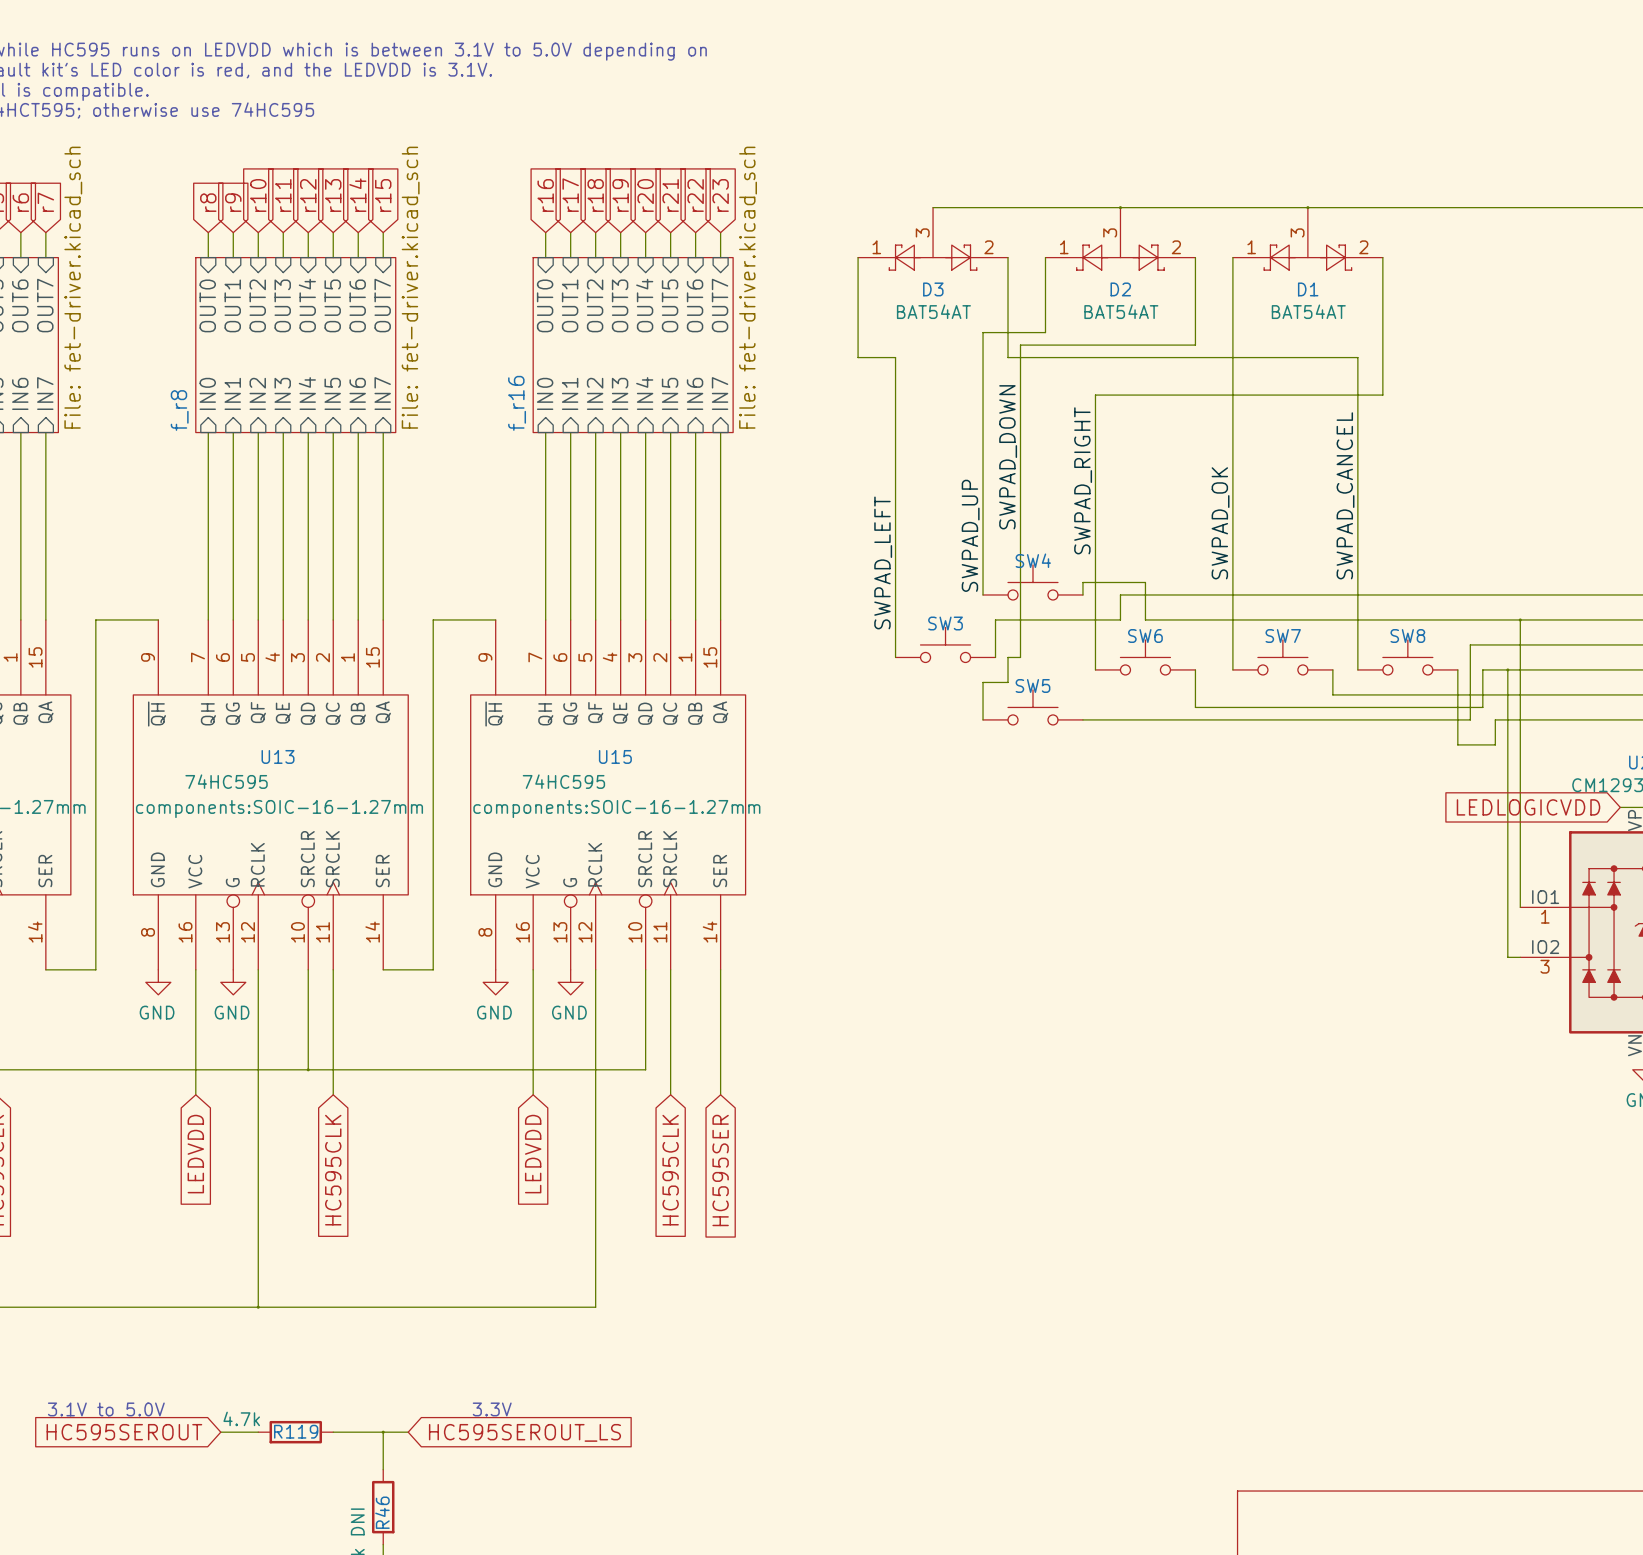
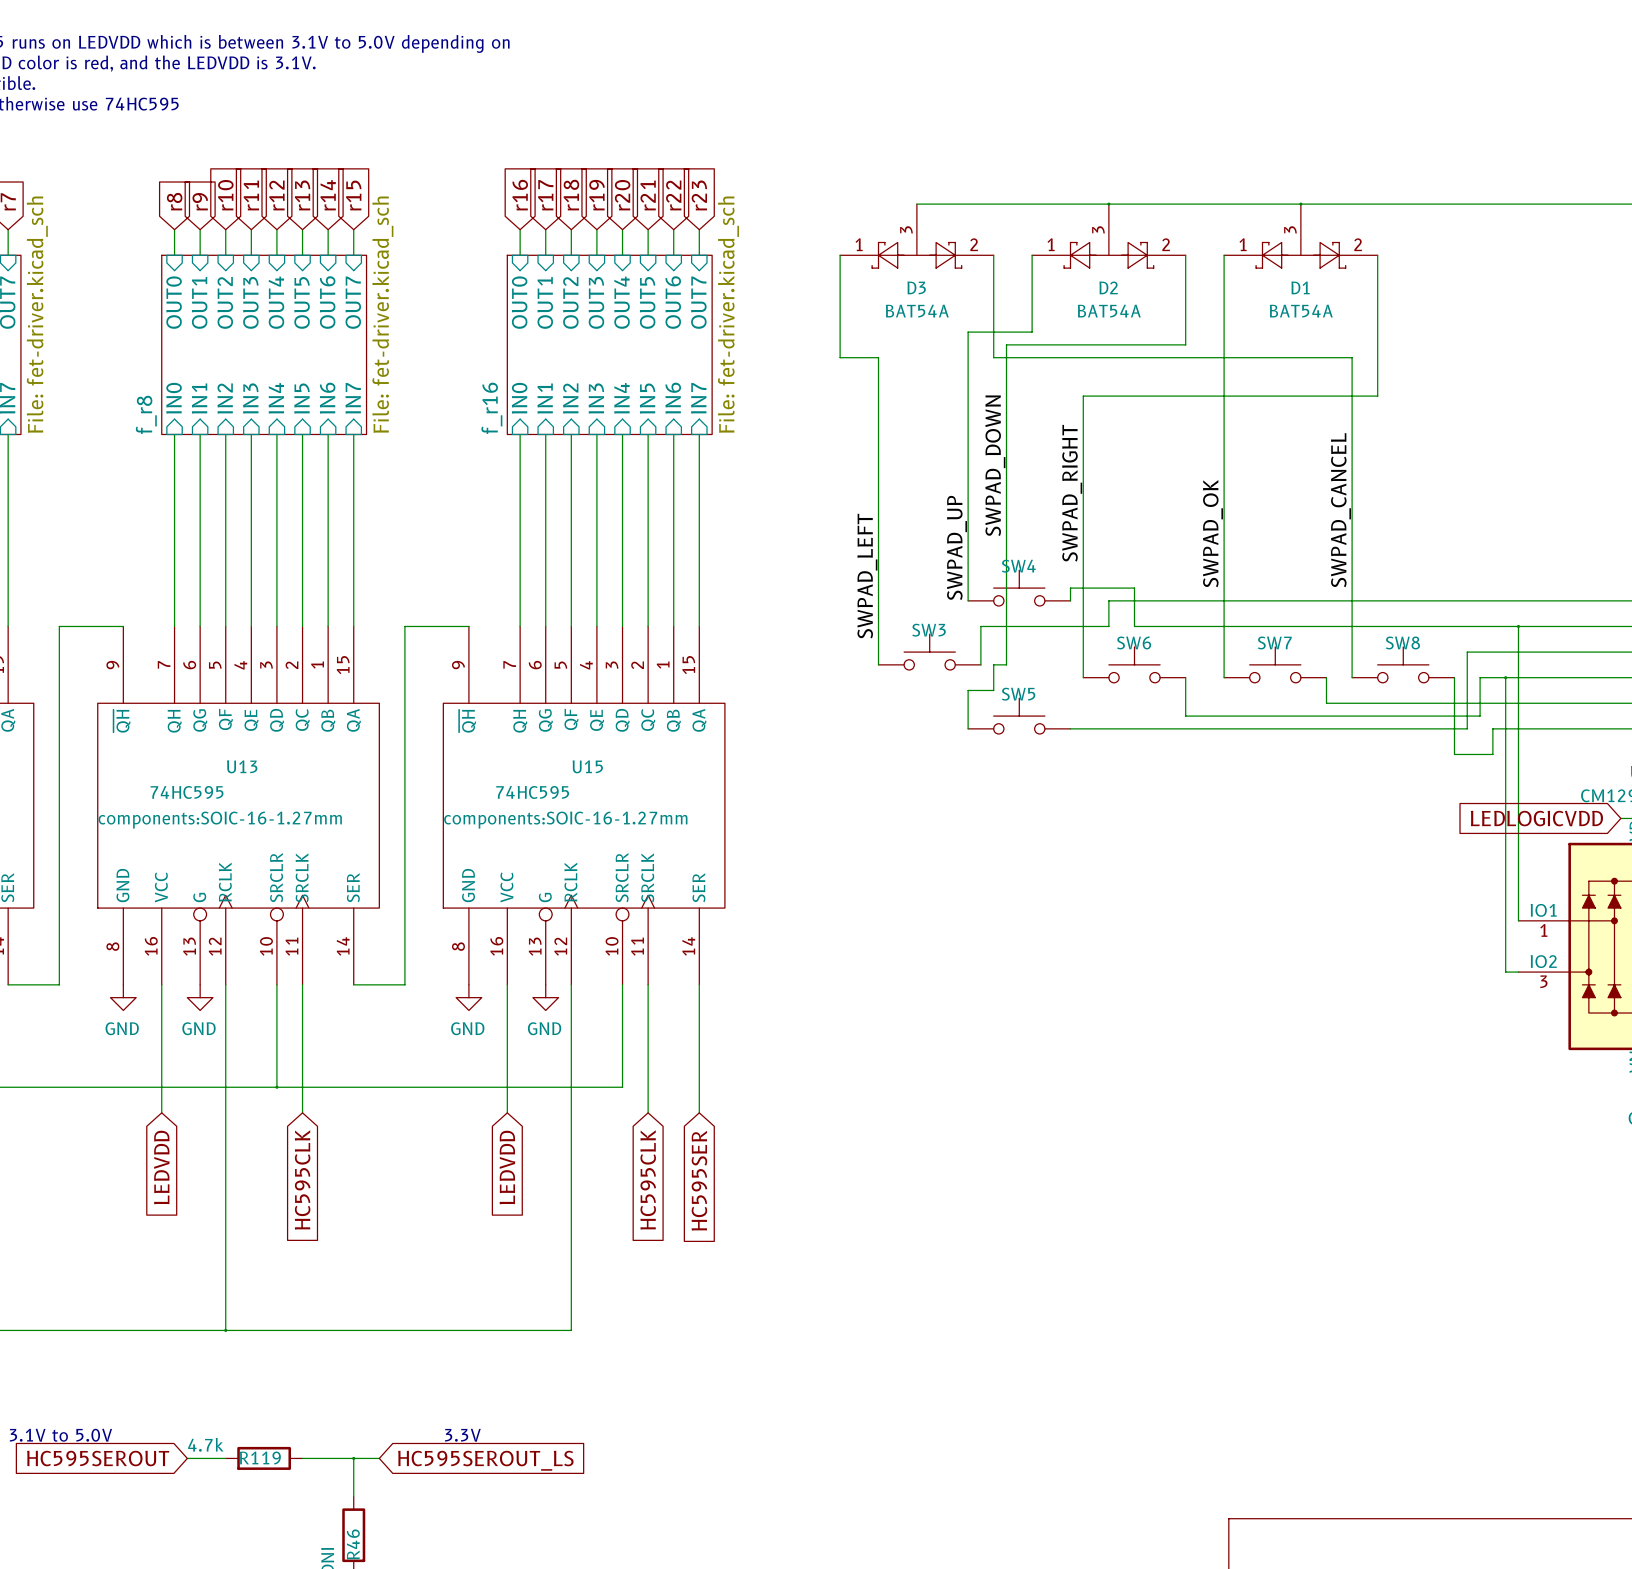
D3 value: BAT54AT (933, 311) -> BAT54A (917, 311)
D2 value: BAT54AT (1121, 311) -> BAT54A (1109, 311)
D1 value: BAT54AT (1308, 311) -> BAT54A (1301, 311)

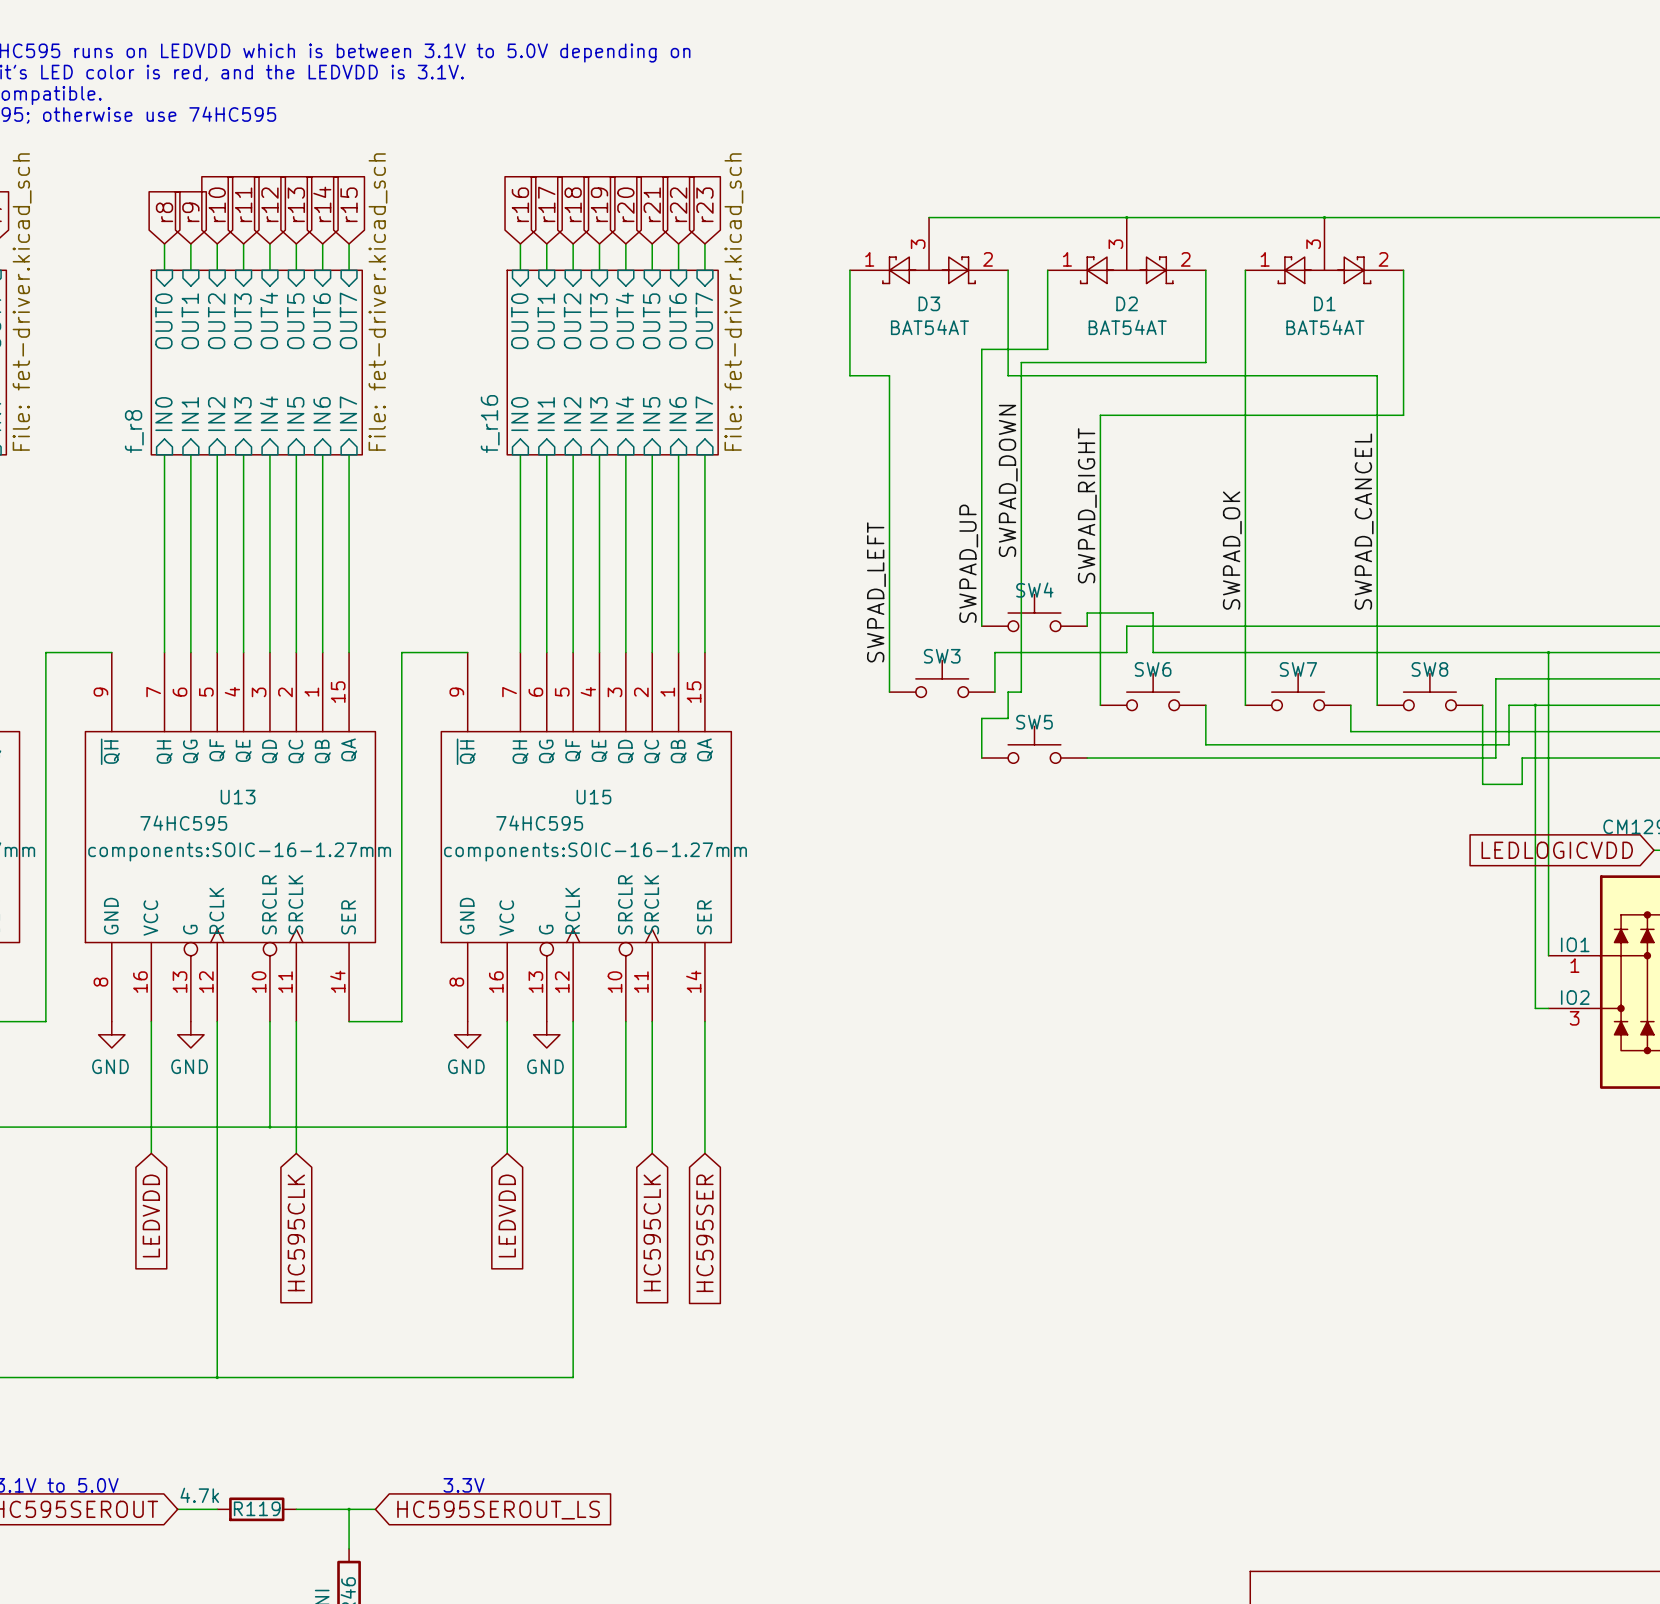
D3 value: BAT54A (917, 311) -> BAT54AT (929, 327)
D2 value: BAT54A (1109, 311) -> BAT54AT (1127, 327)
D1 value: BAT54A (1301, 311) -> BAT54AT (1325, 327)

